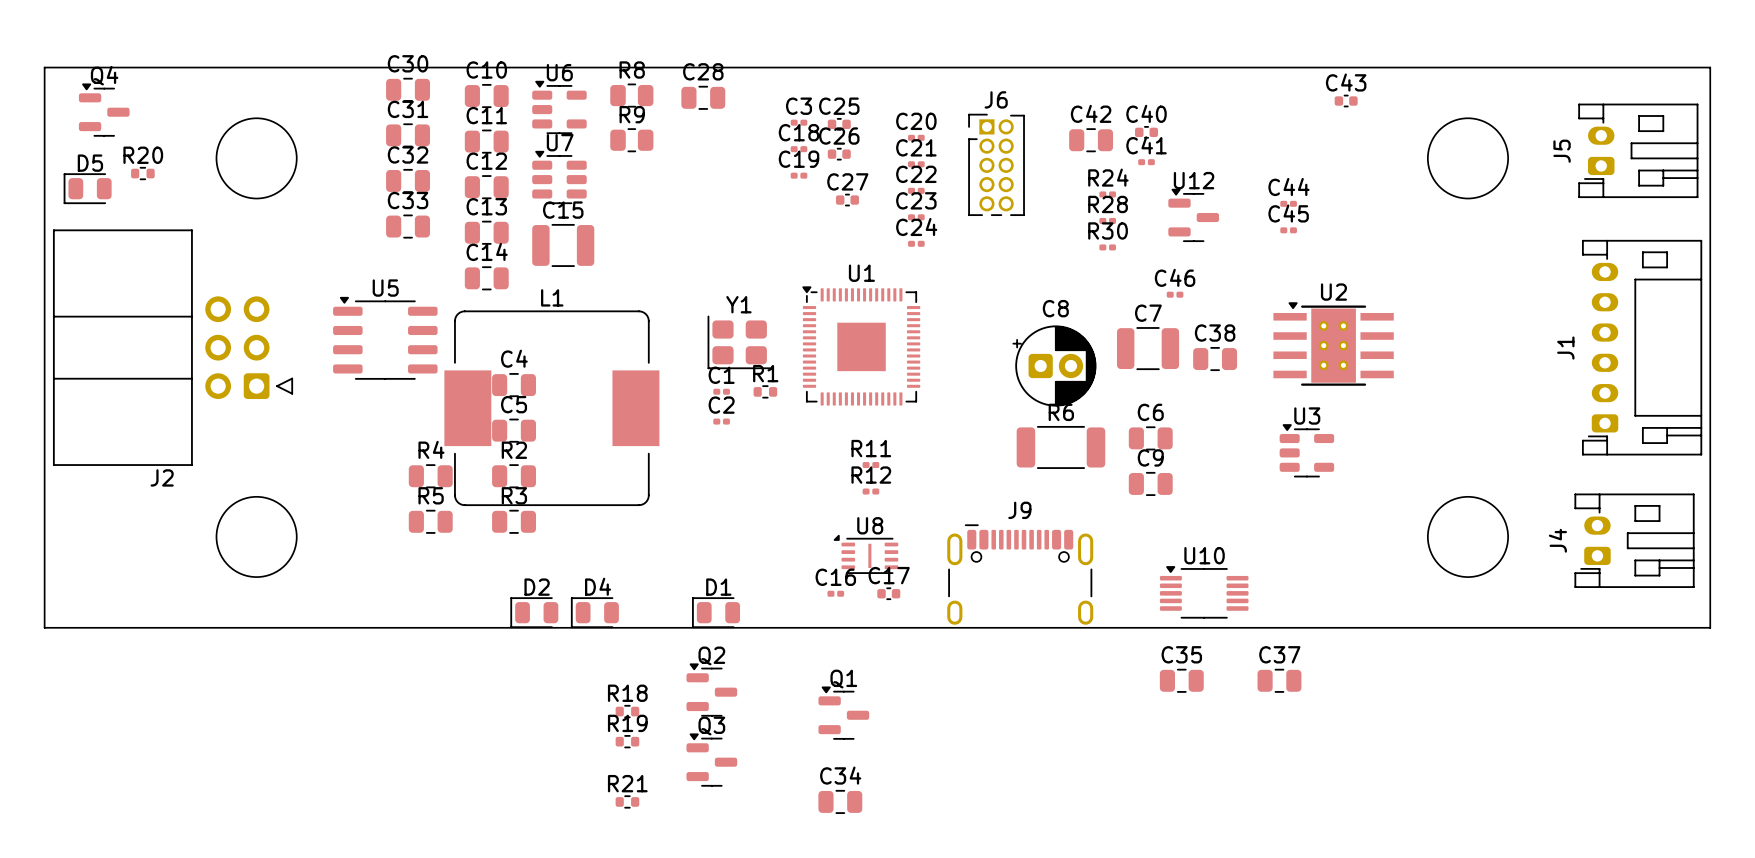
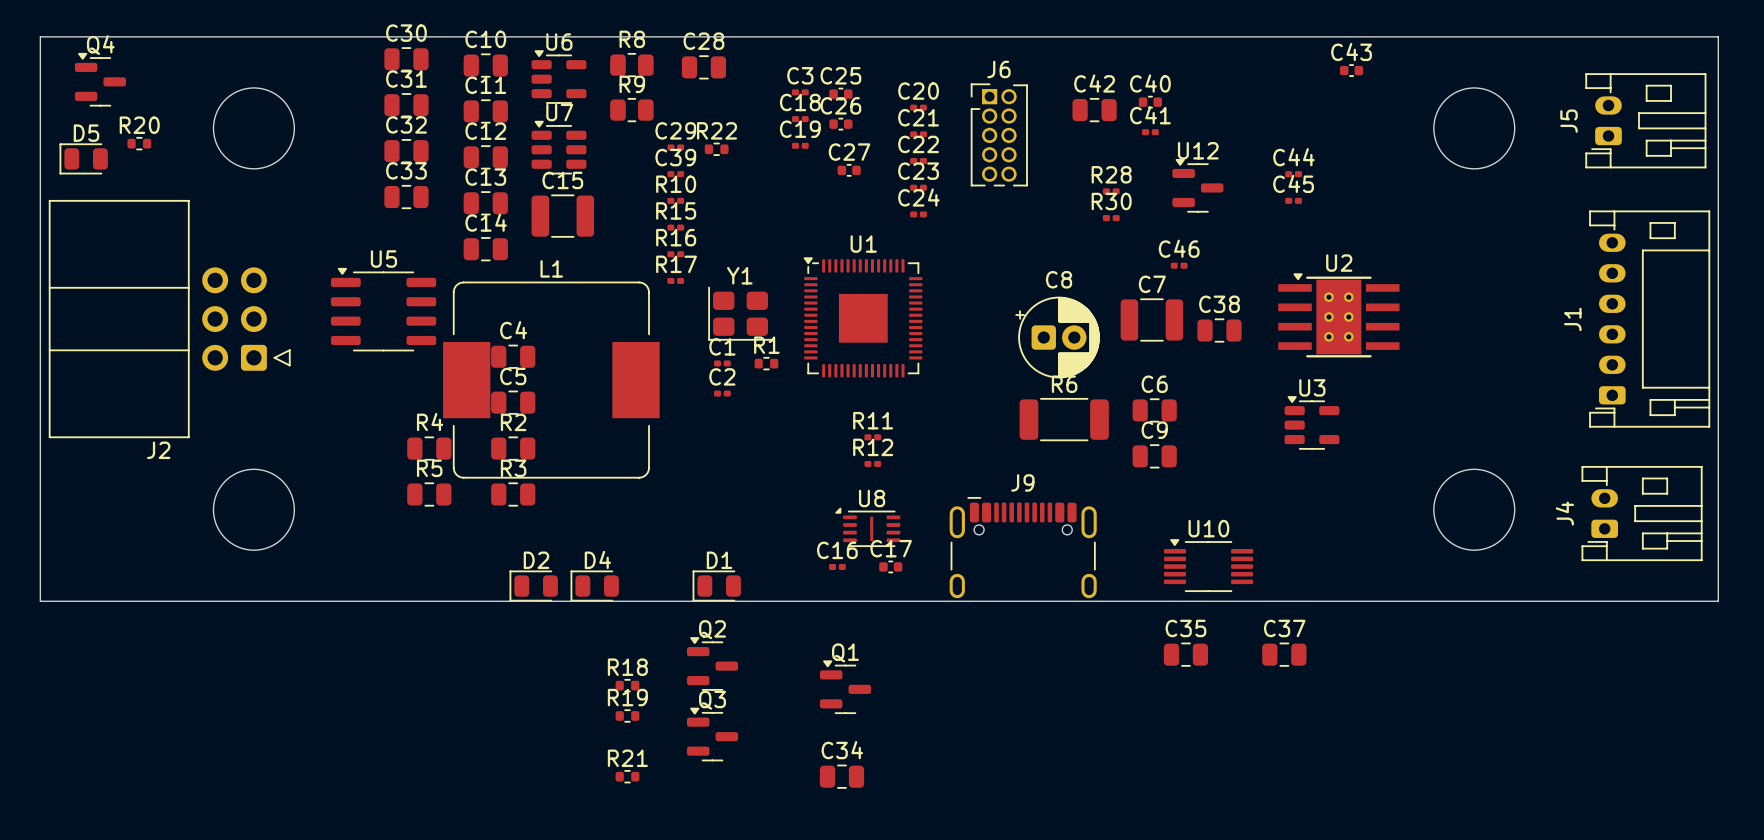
C29: none -> (675, 147)
R22: none -> (716, 149)
R24: (1107, 194) -> none
C39: none -> (675, 174)
R10: none -> (675, 200)
R15: none -> (675, 227)
R16: none -> (675, 254)
R17: none -> (675, 280)

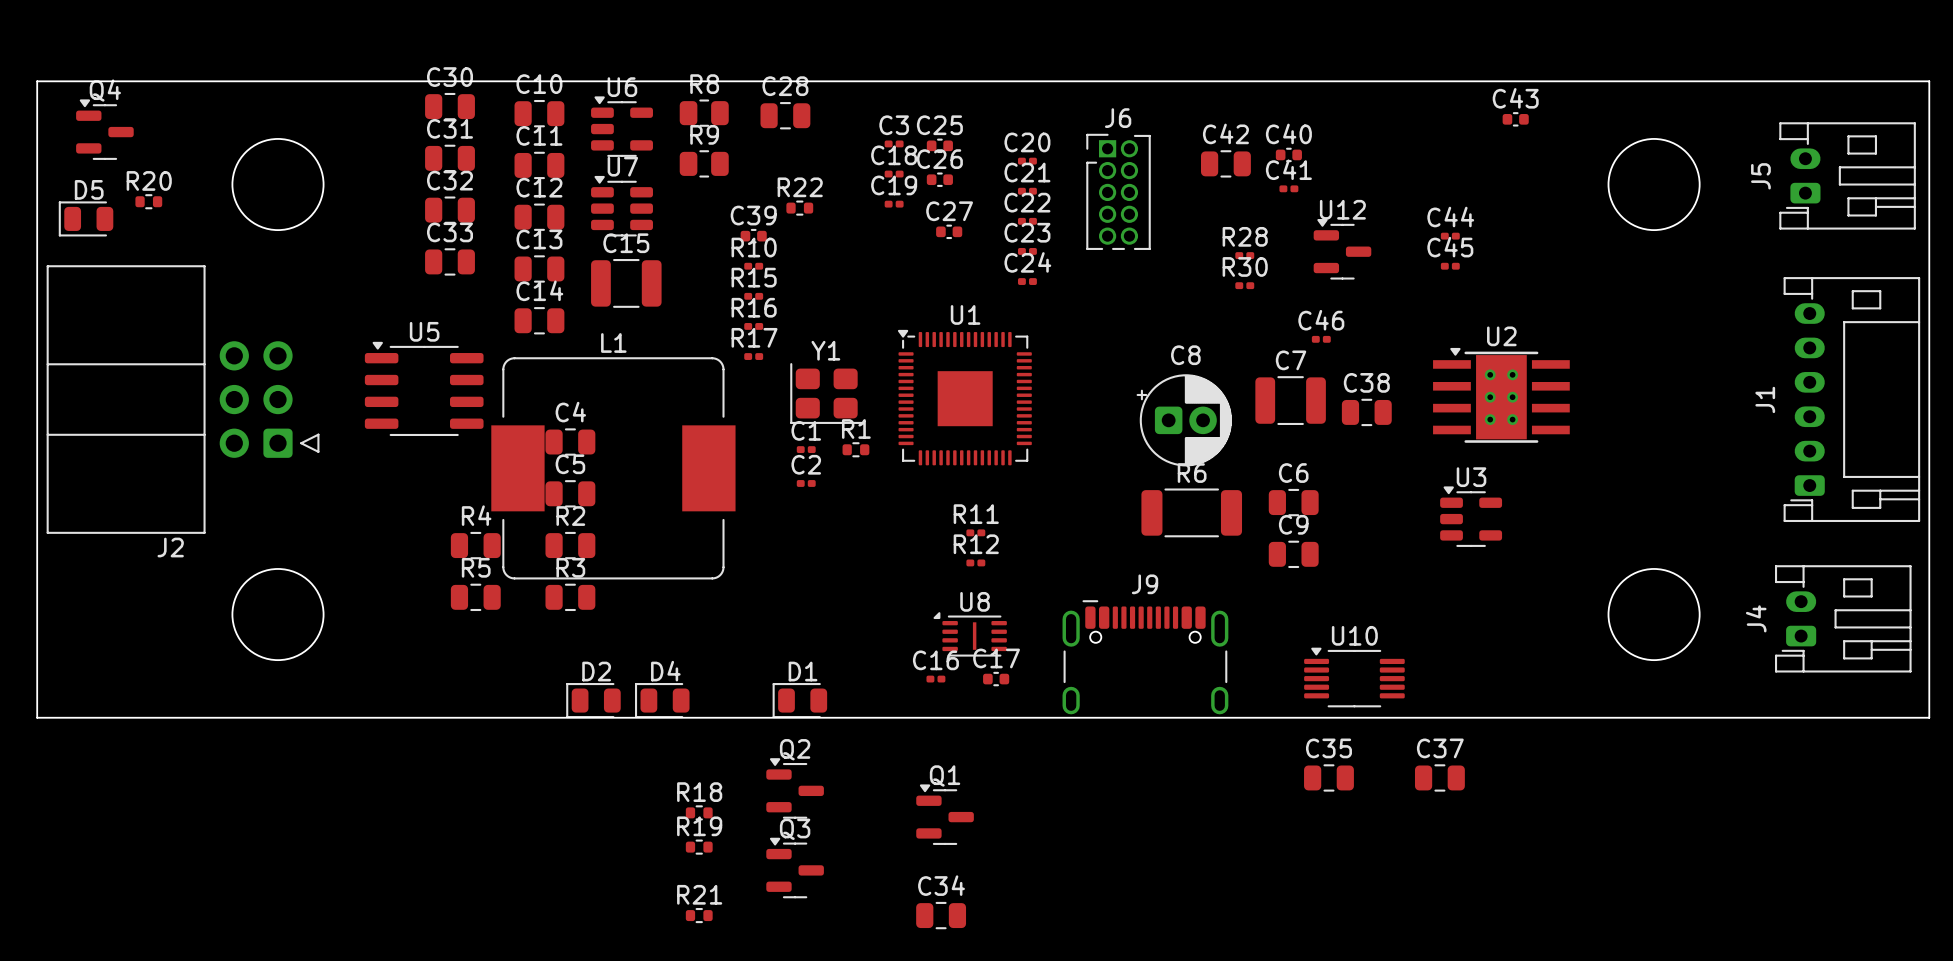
C29: (675, 147) -> none
C39 footprint: [667, 171, 685, 178] -> [740, 228, 767, 244]

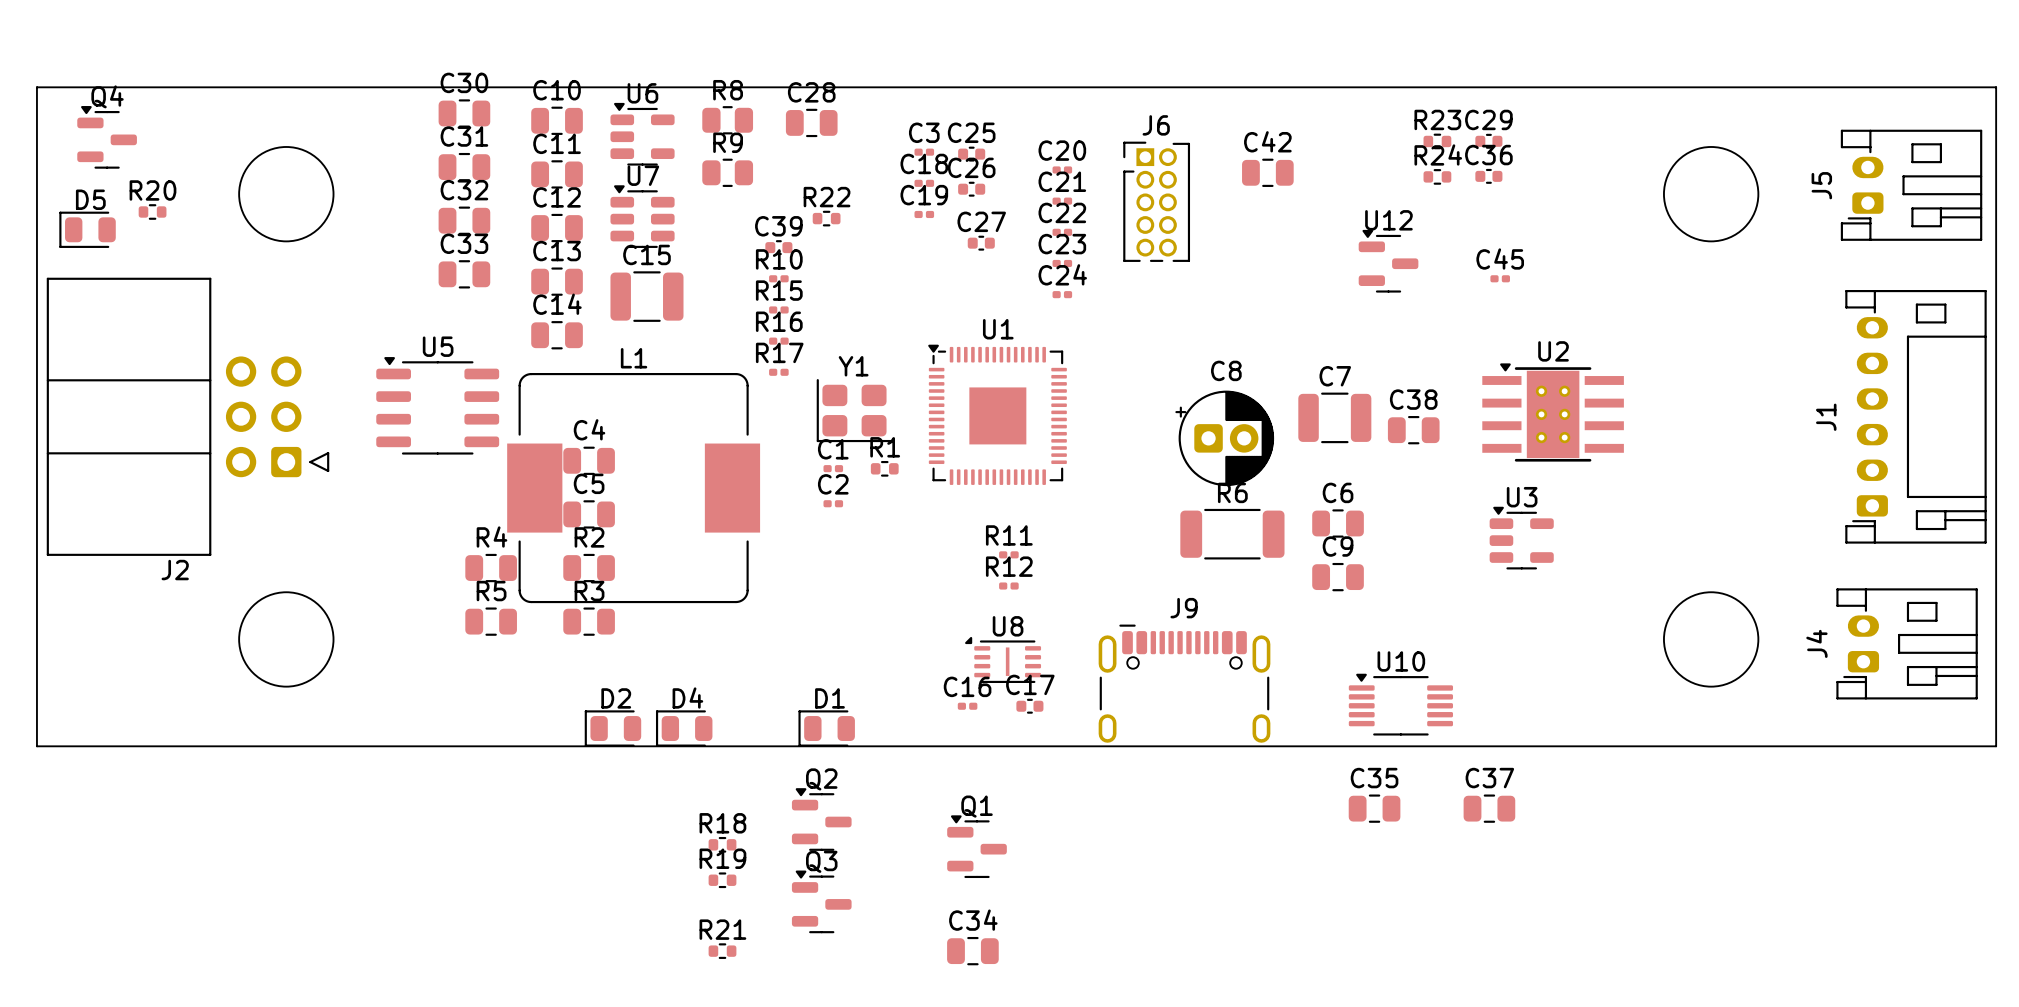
C43: (1515, 119) -> none
R23: none -> (1437, 141)
C29: none -> (1488, 141)
C40: (1288, 154) -> none
R24: none -> (1437, 176)
C36: none -> (1488, 176)
C41: (1288, 188) -> none
C44: (1450, 236) -> none
R28: (1244, 255) -> none
R30: (1244, 285) -> none
C46: (1321, 339) -> none

